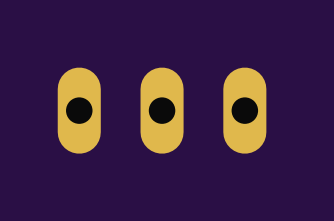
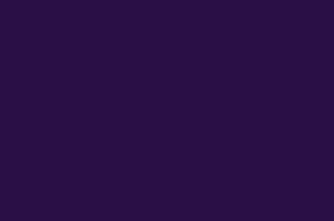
part: (162, 110) -> none

